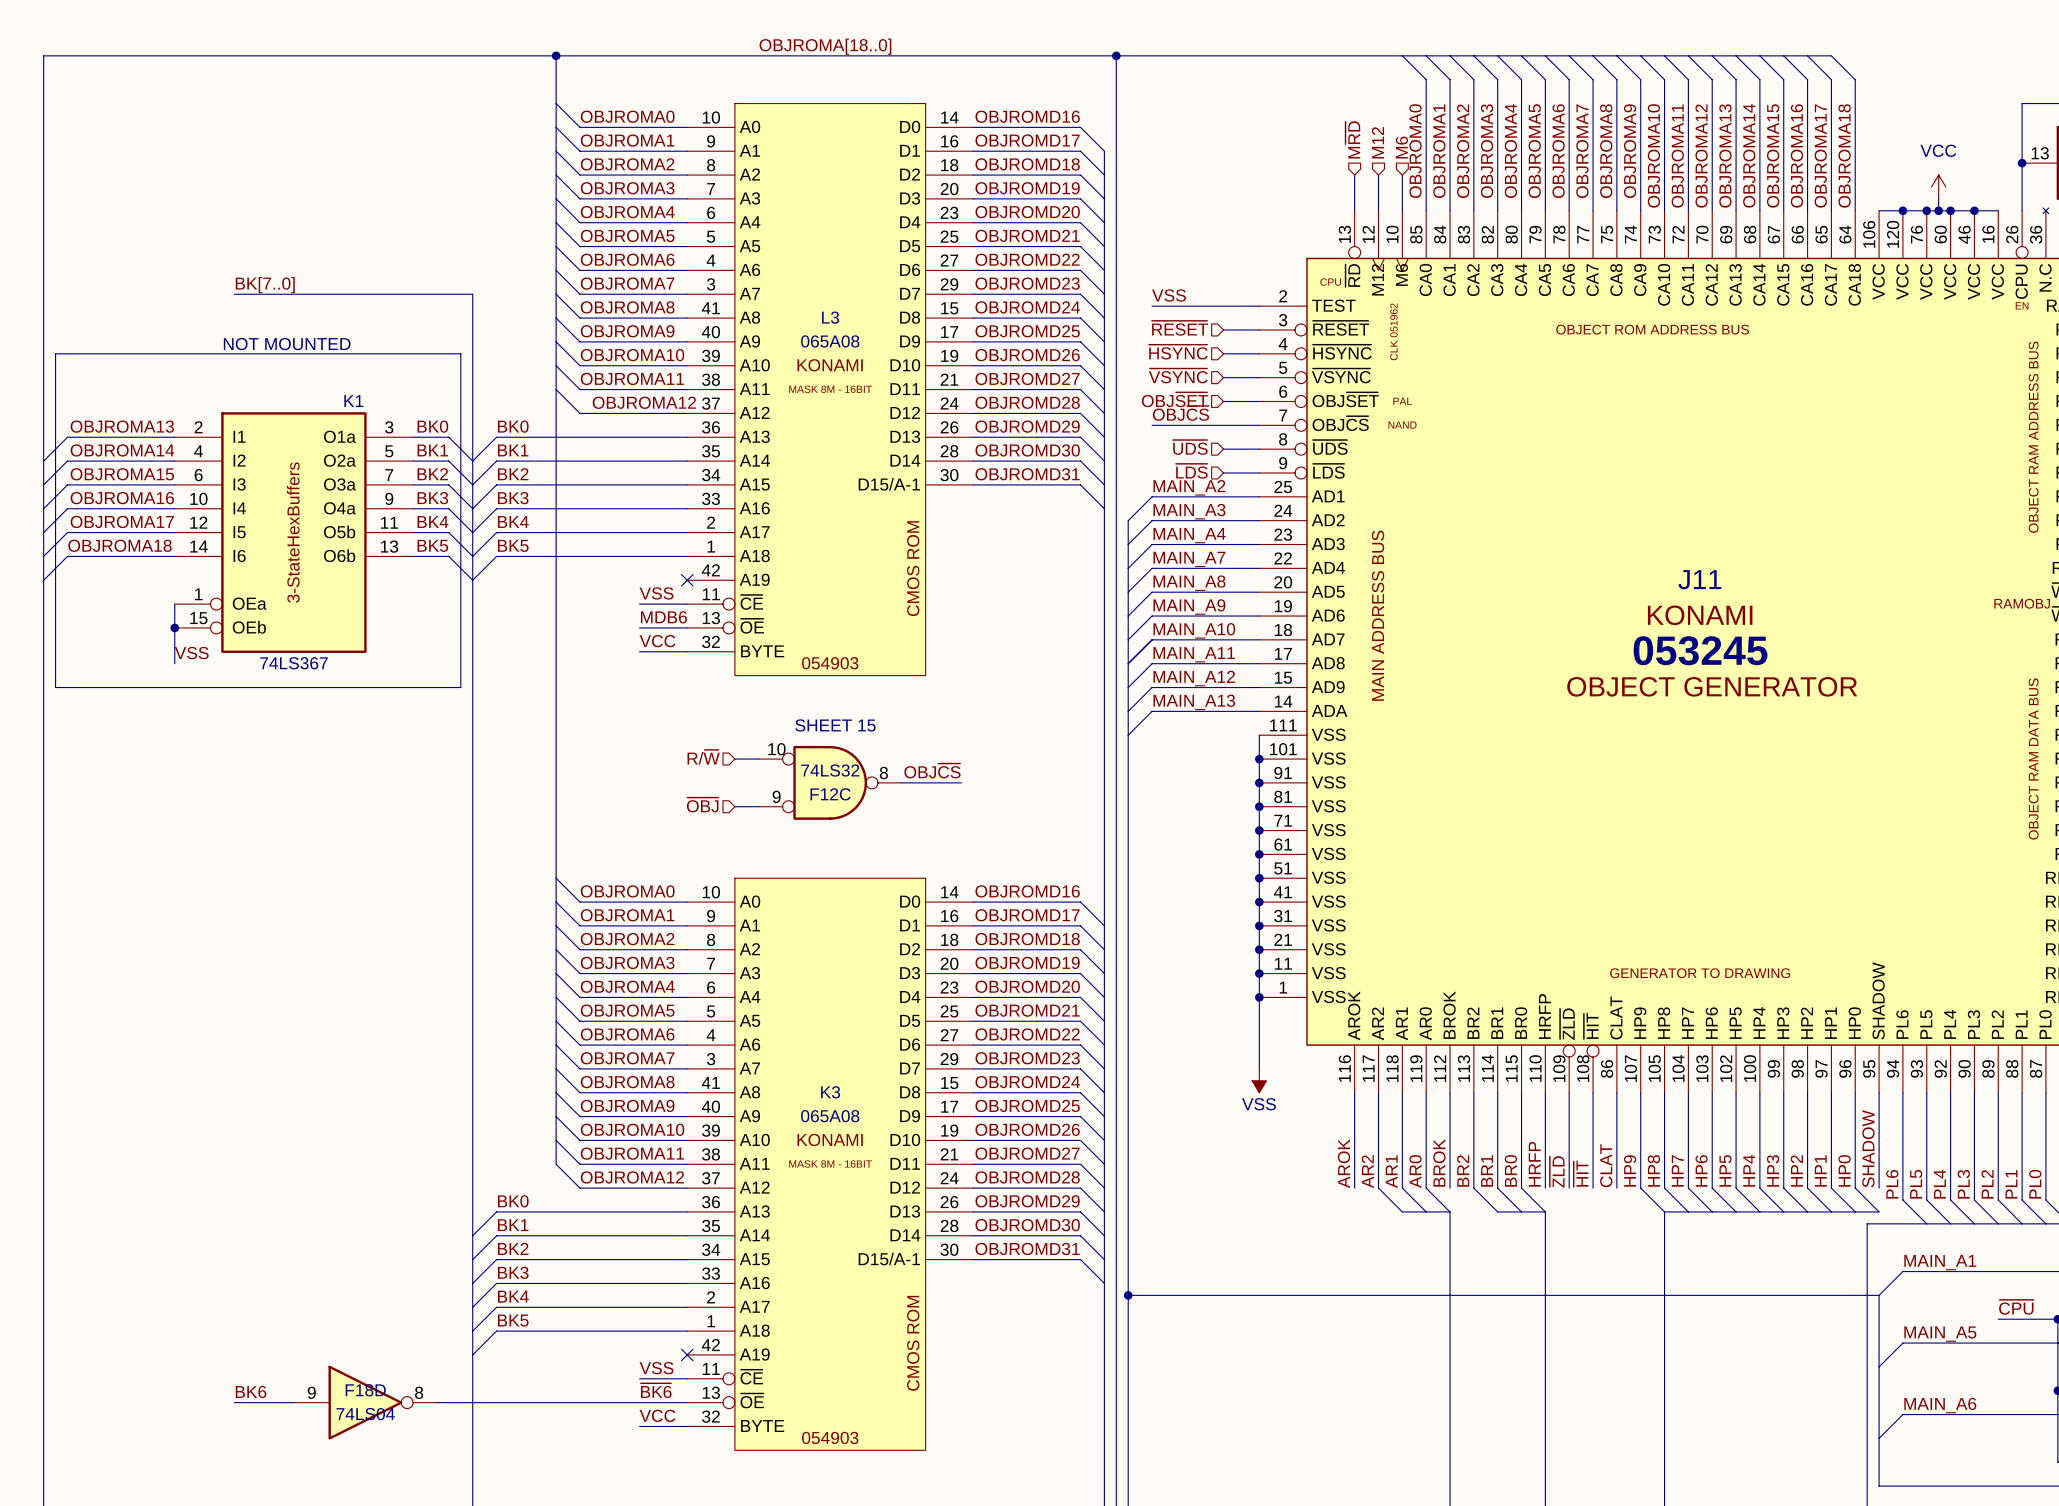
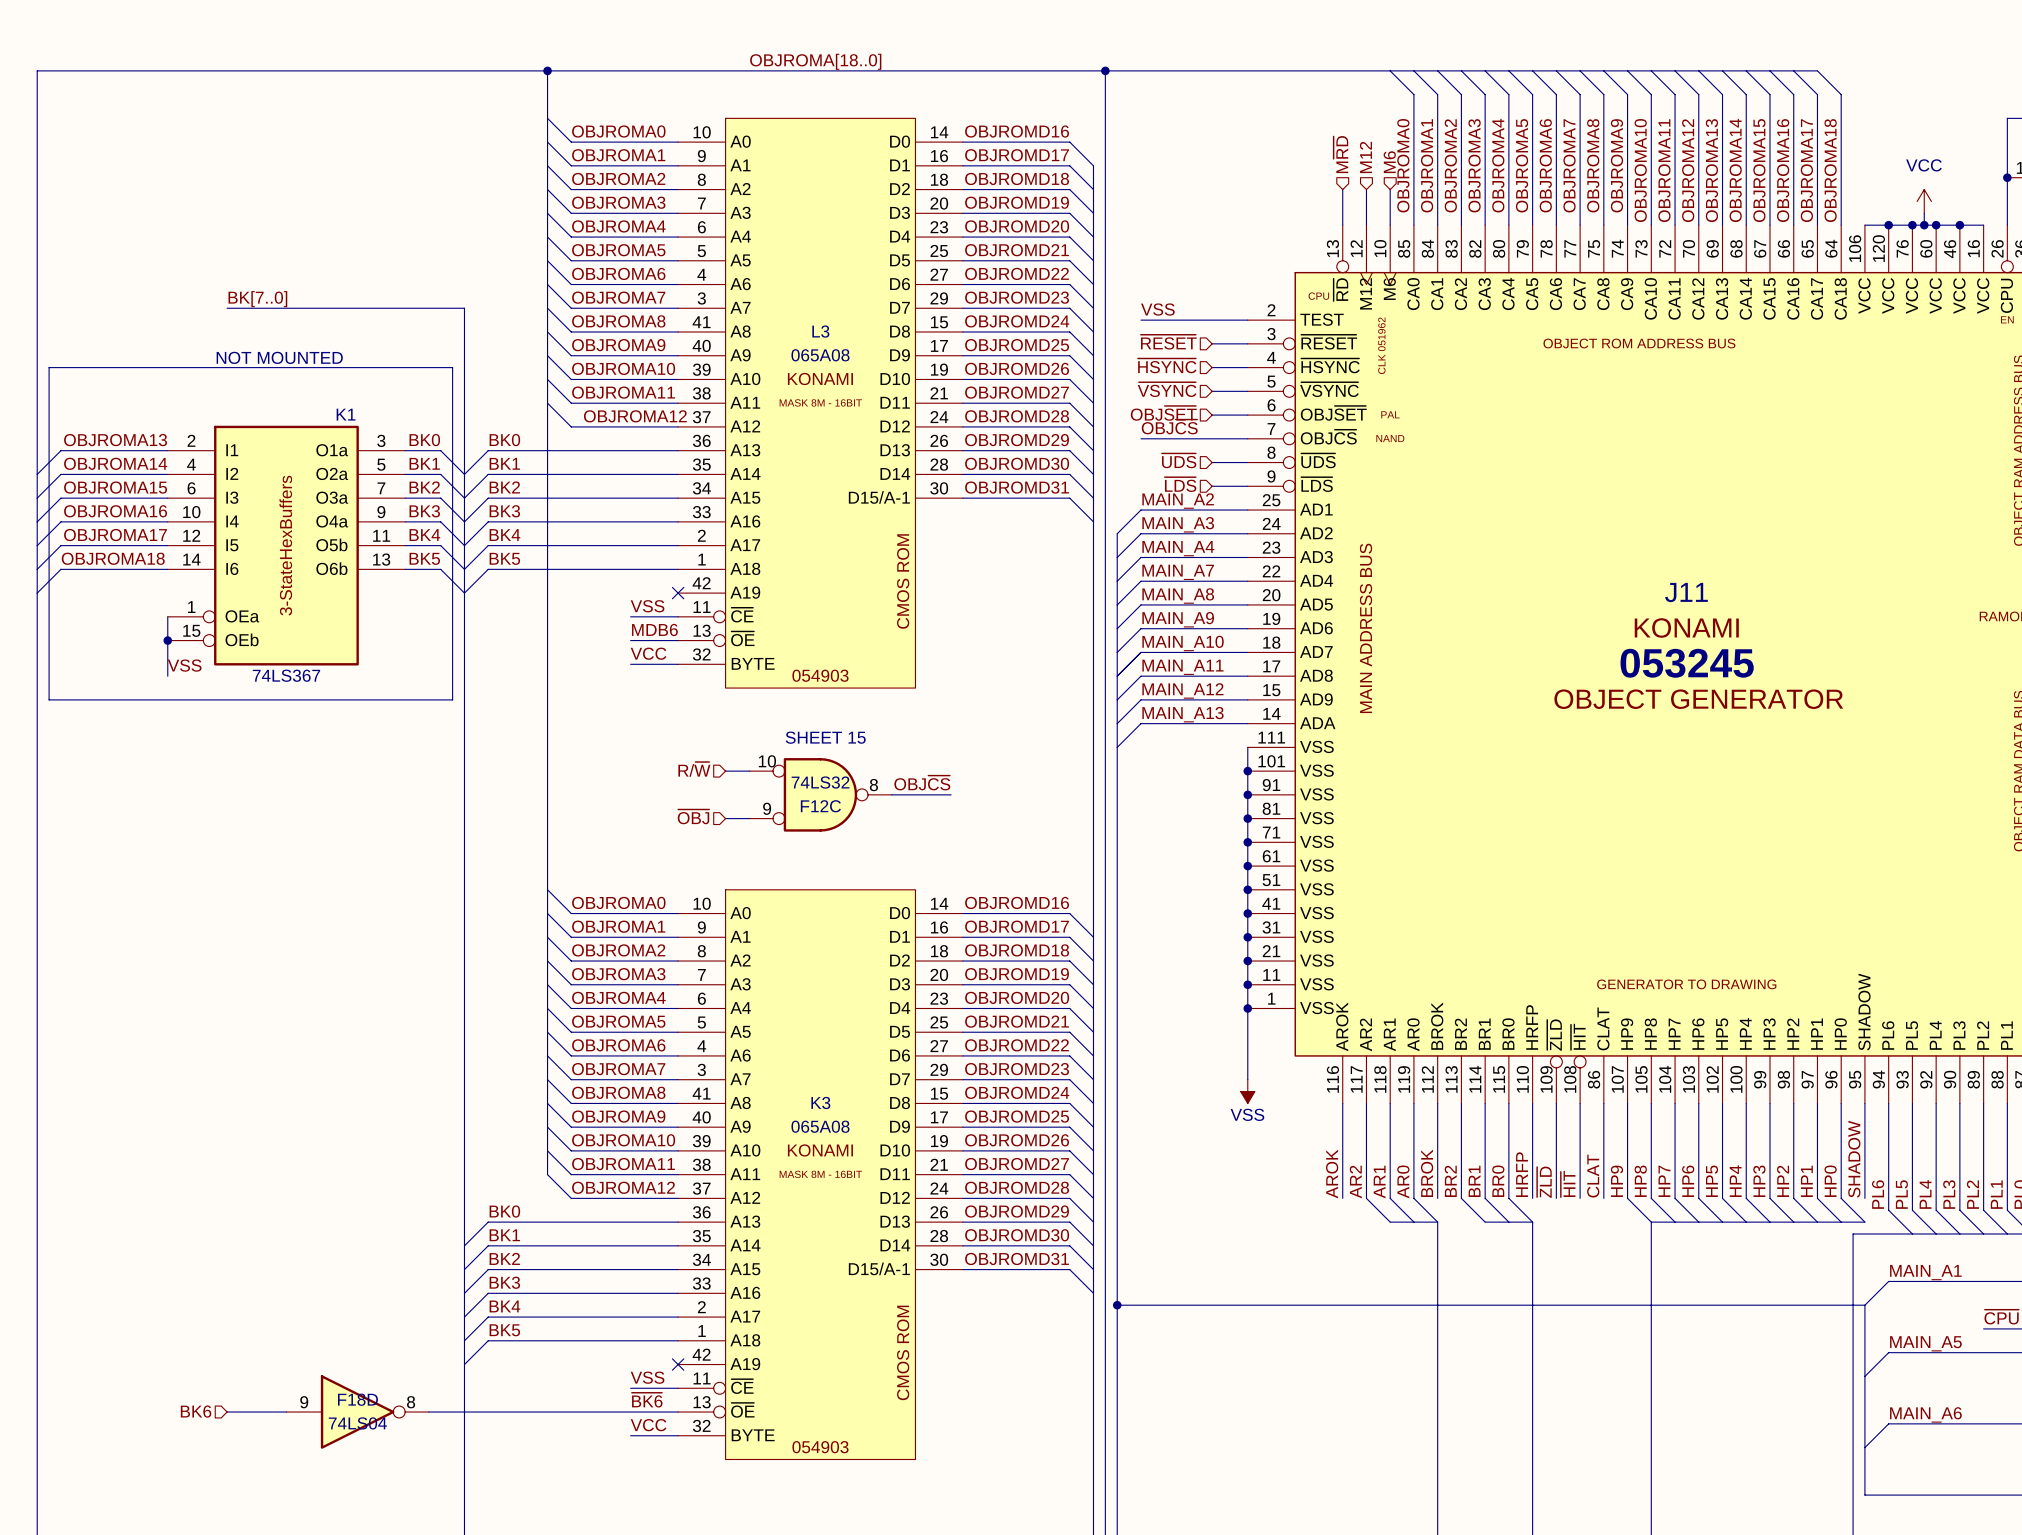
label: BK6 (251, 1392) -> none
hierarchical label: none -> BK6 (196, 1411)

